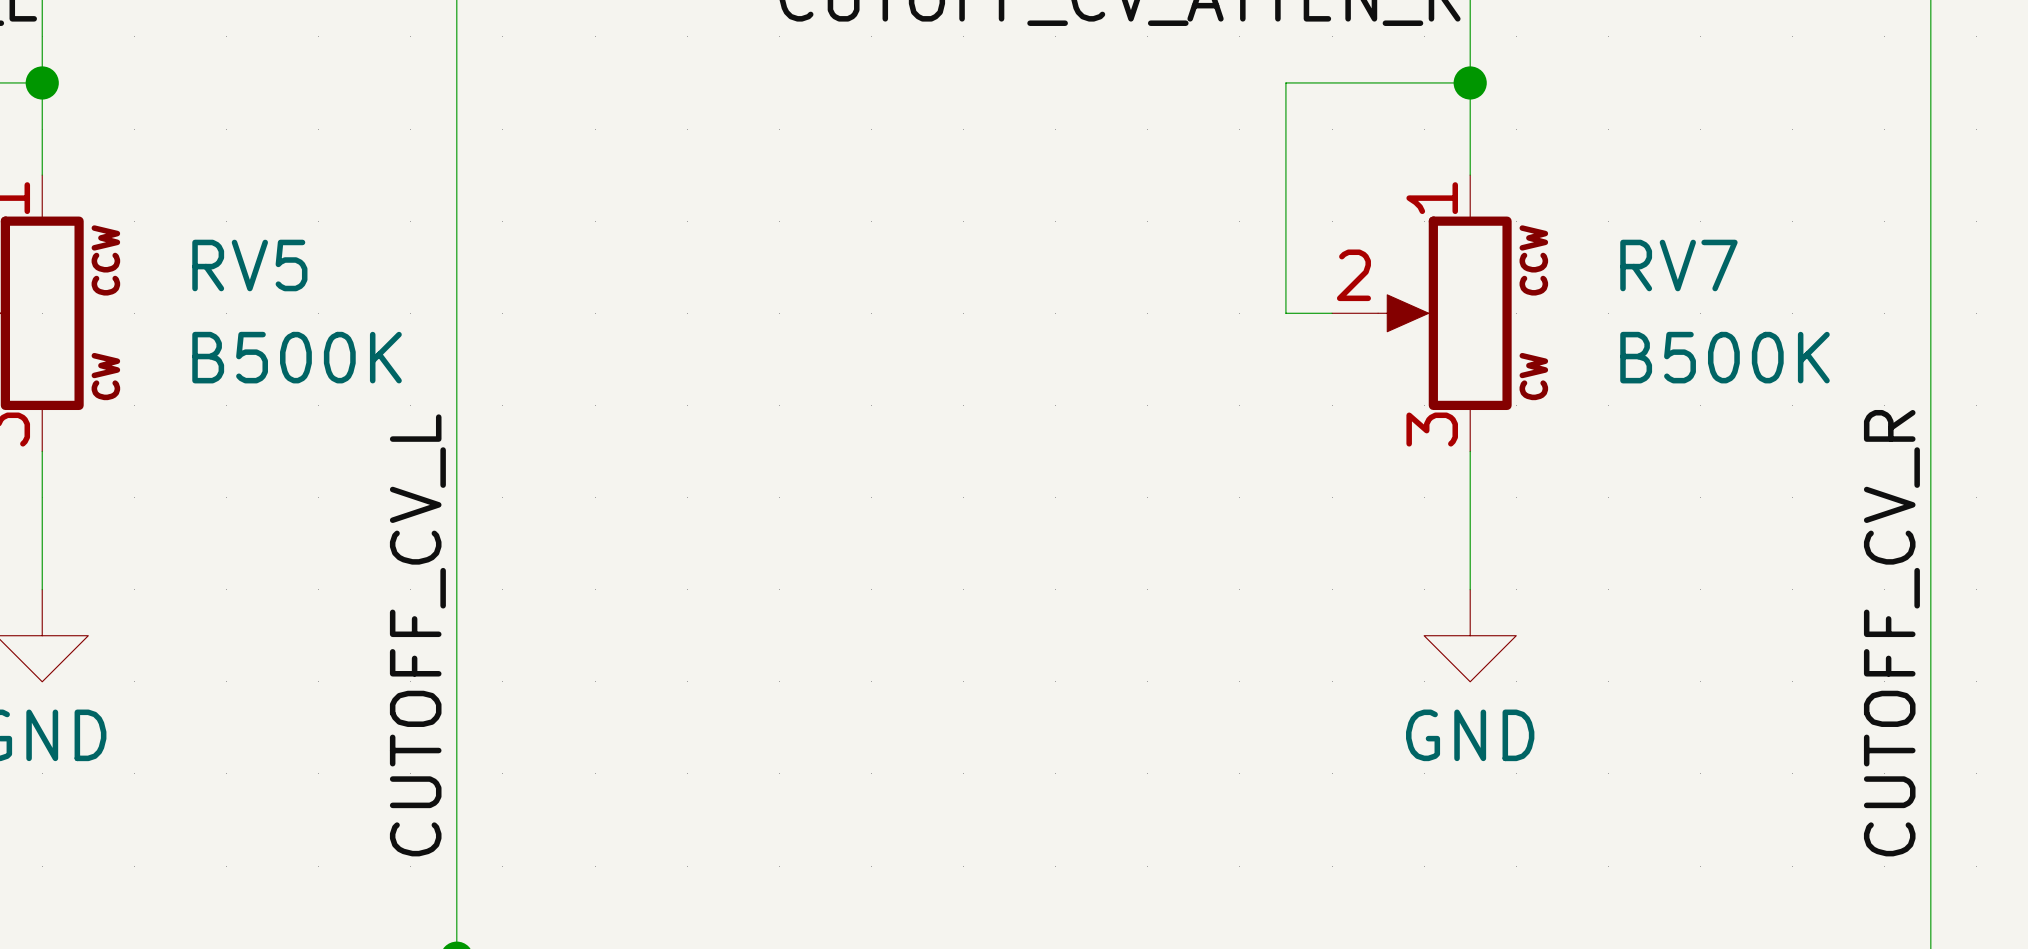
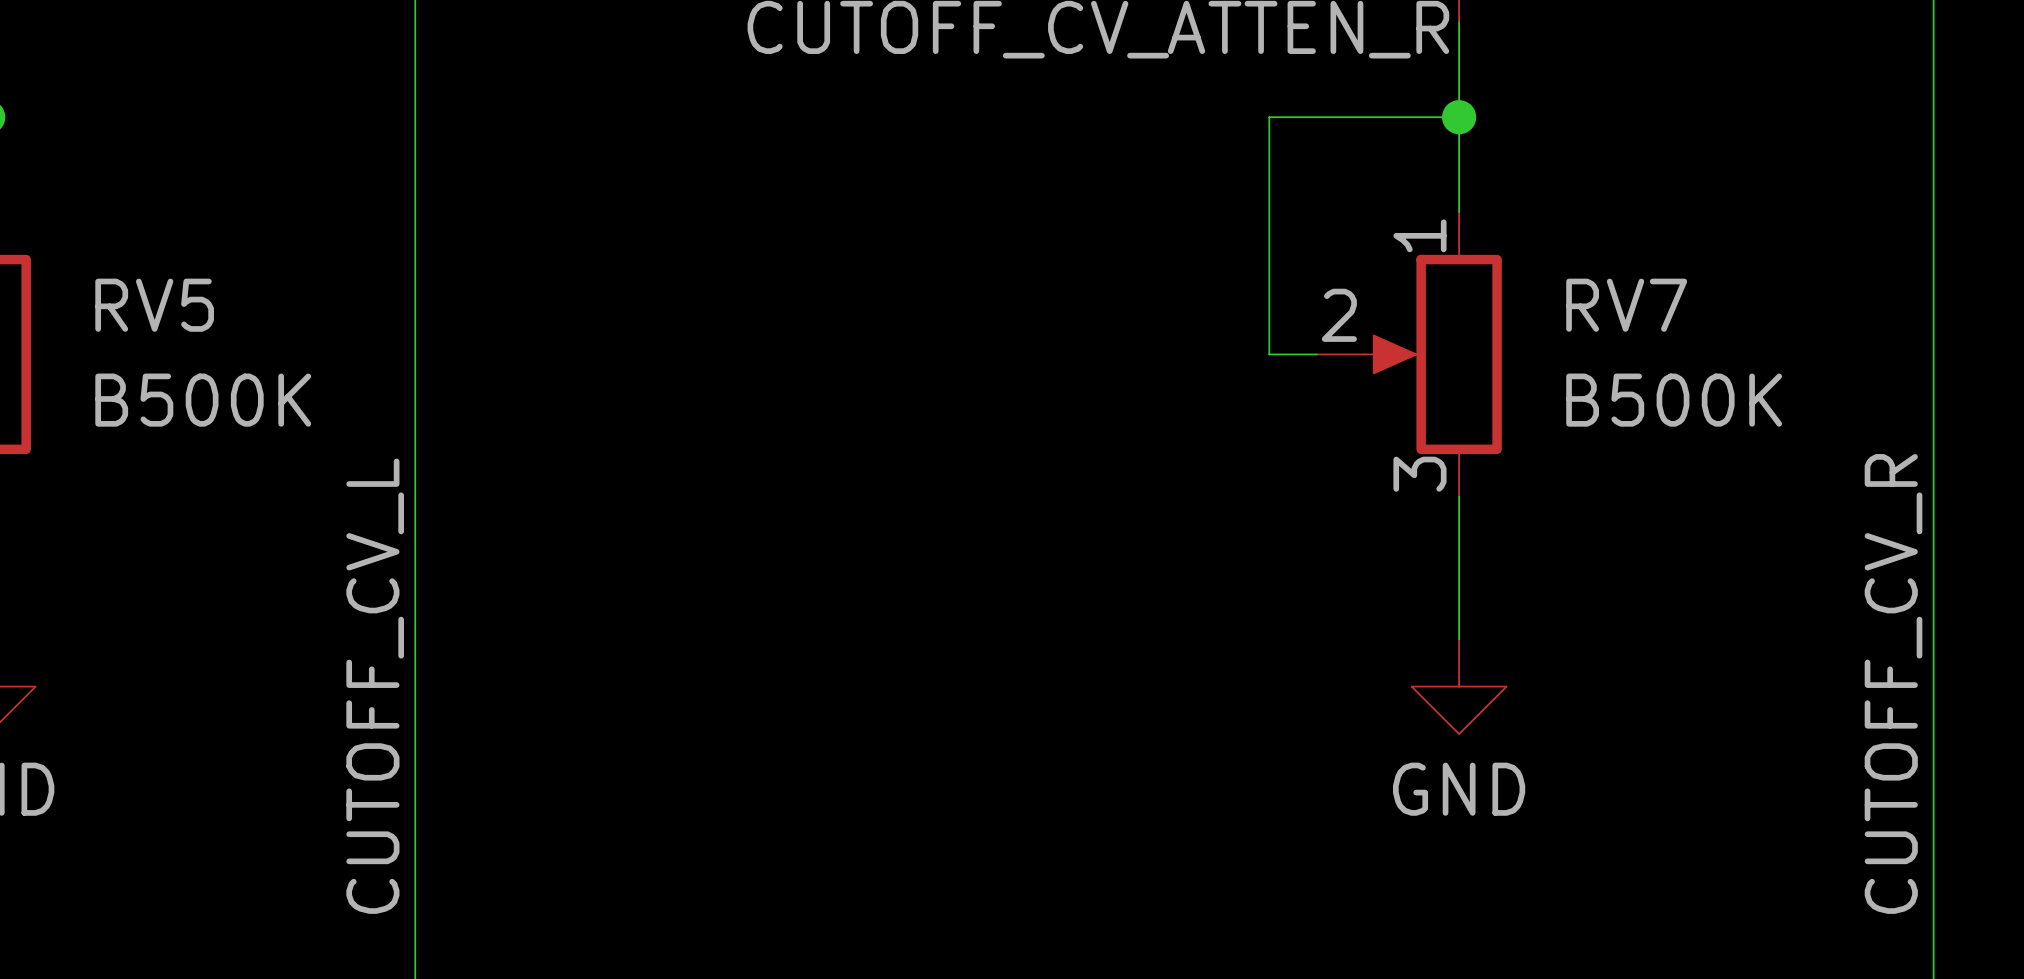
RV5 text: CCW (105, 260) -> none
RV7 text: CCW (1533, 260) -> none
RV5 name position: RV5 (249, 265) -> RV5 (154, 305)
RV7 name position: RV7 (1678, 265) -> RV7 (1626, 305)
RV5 value position: B500K (297, 357) -> B500K (203, 400)
RV7 value position: B500K (1724, 357) -> B500K (1674, 400)
RV5 text: CW (105, 376) -> none
RV7 text: CW (1533, 376) -> none

